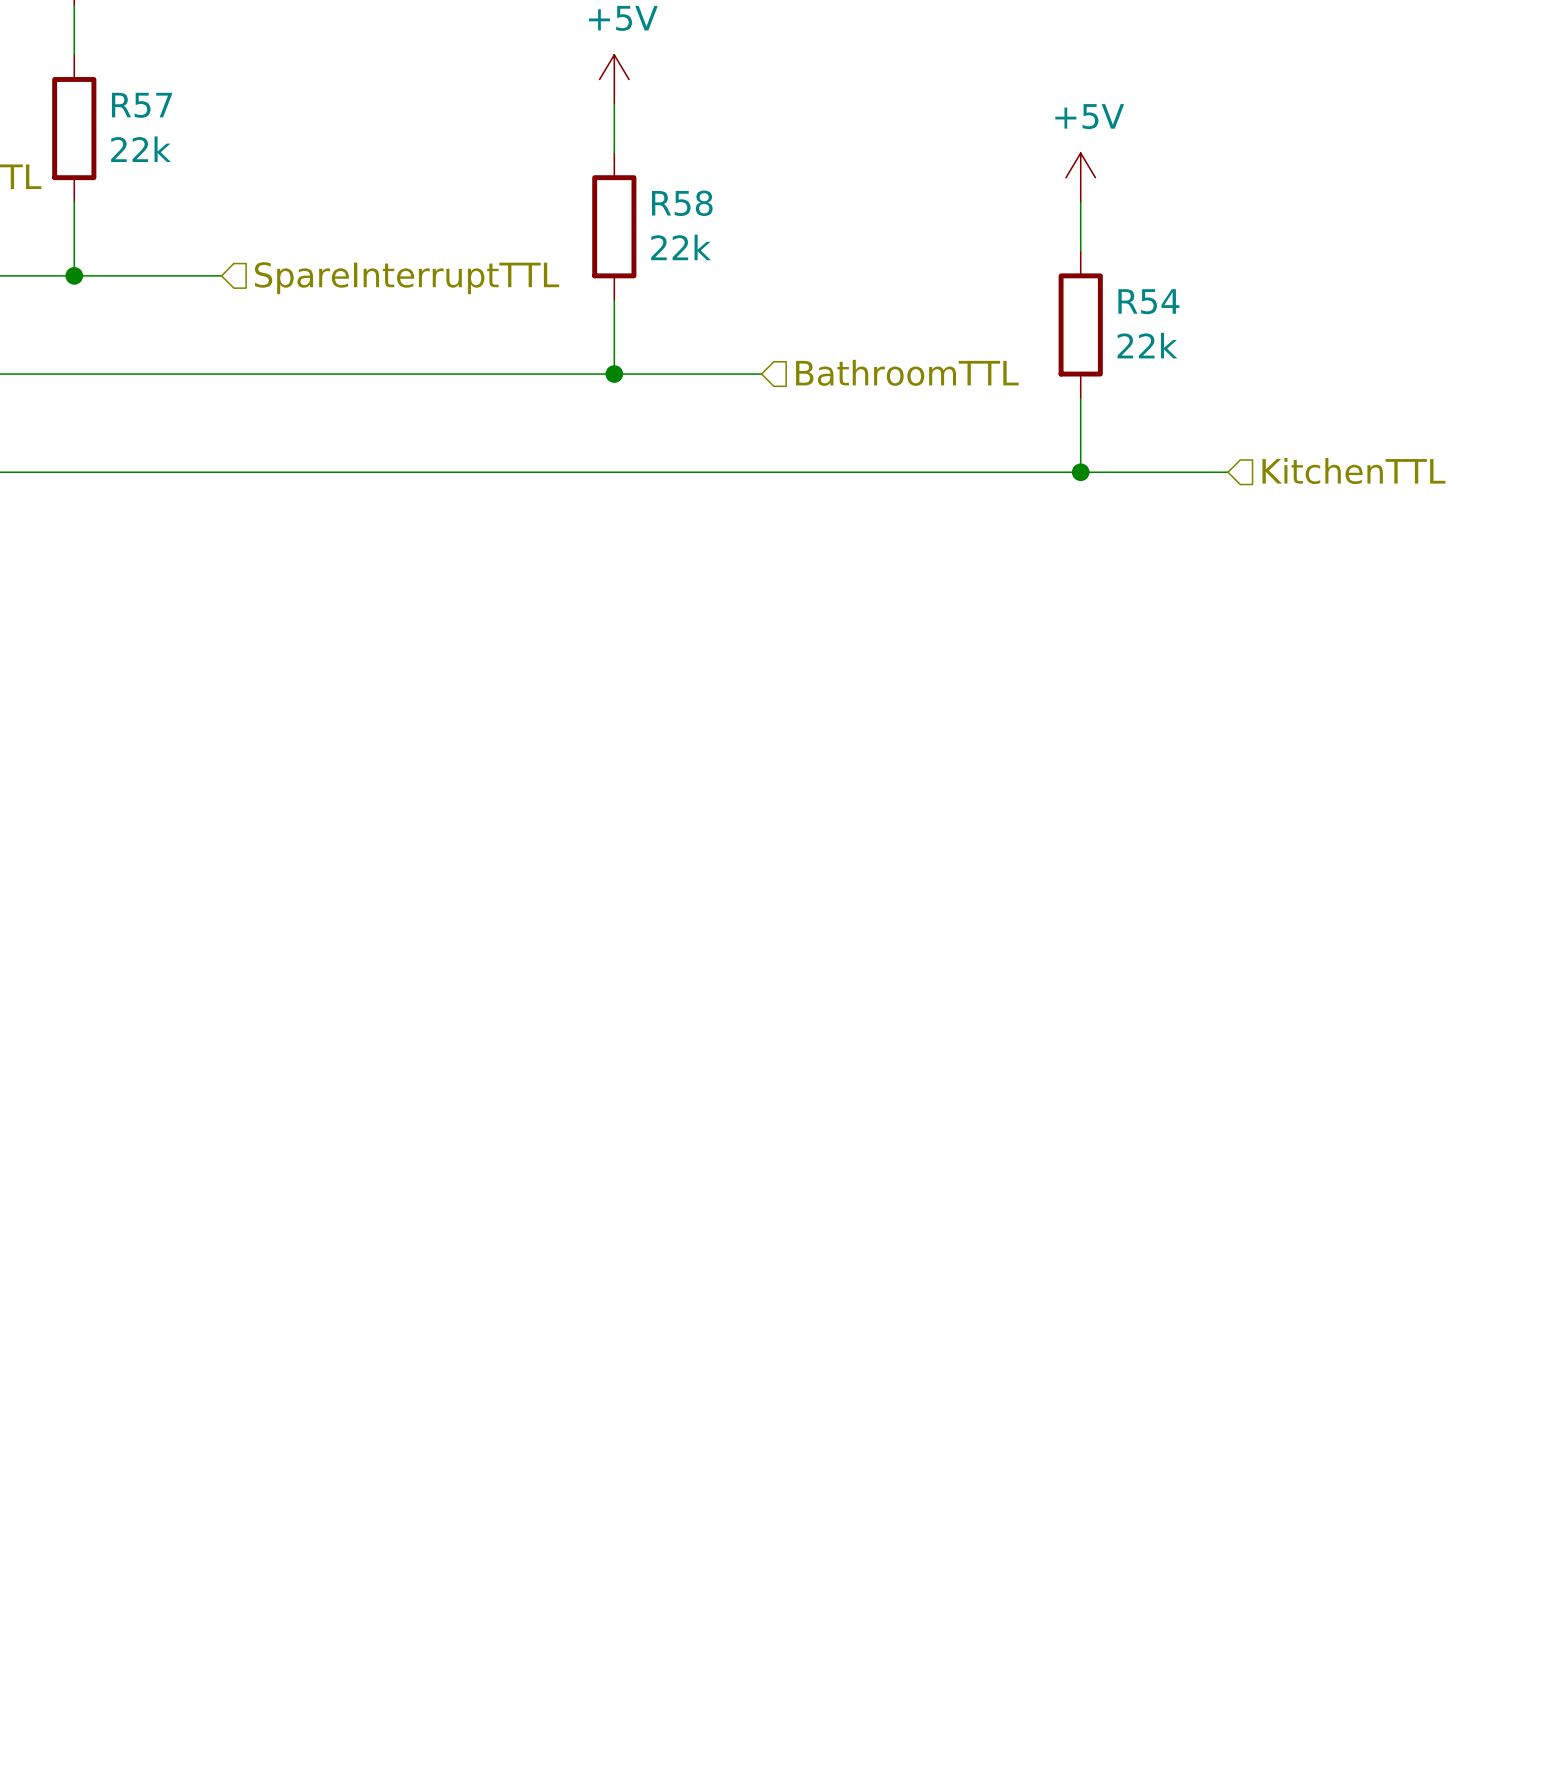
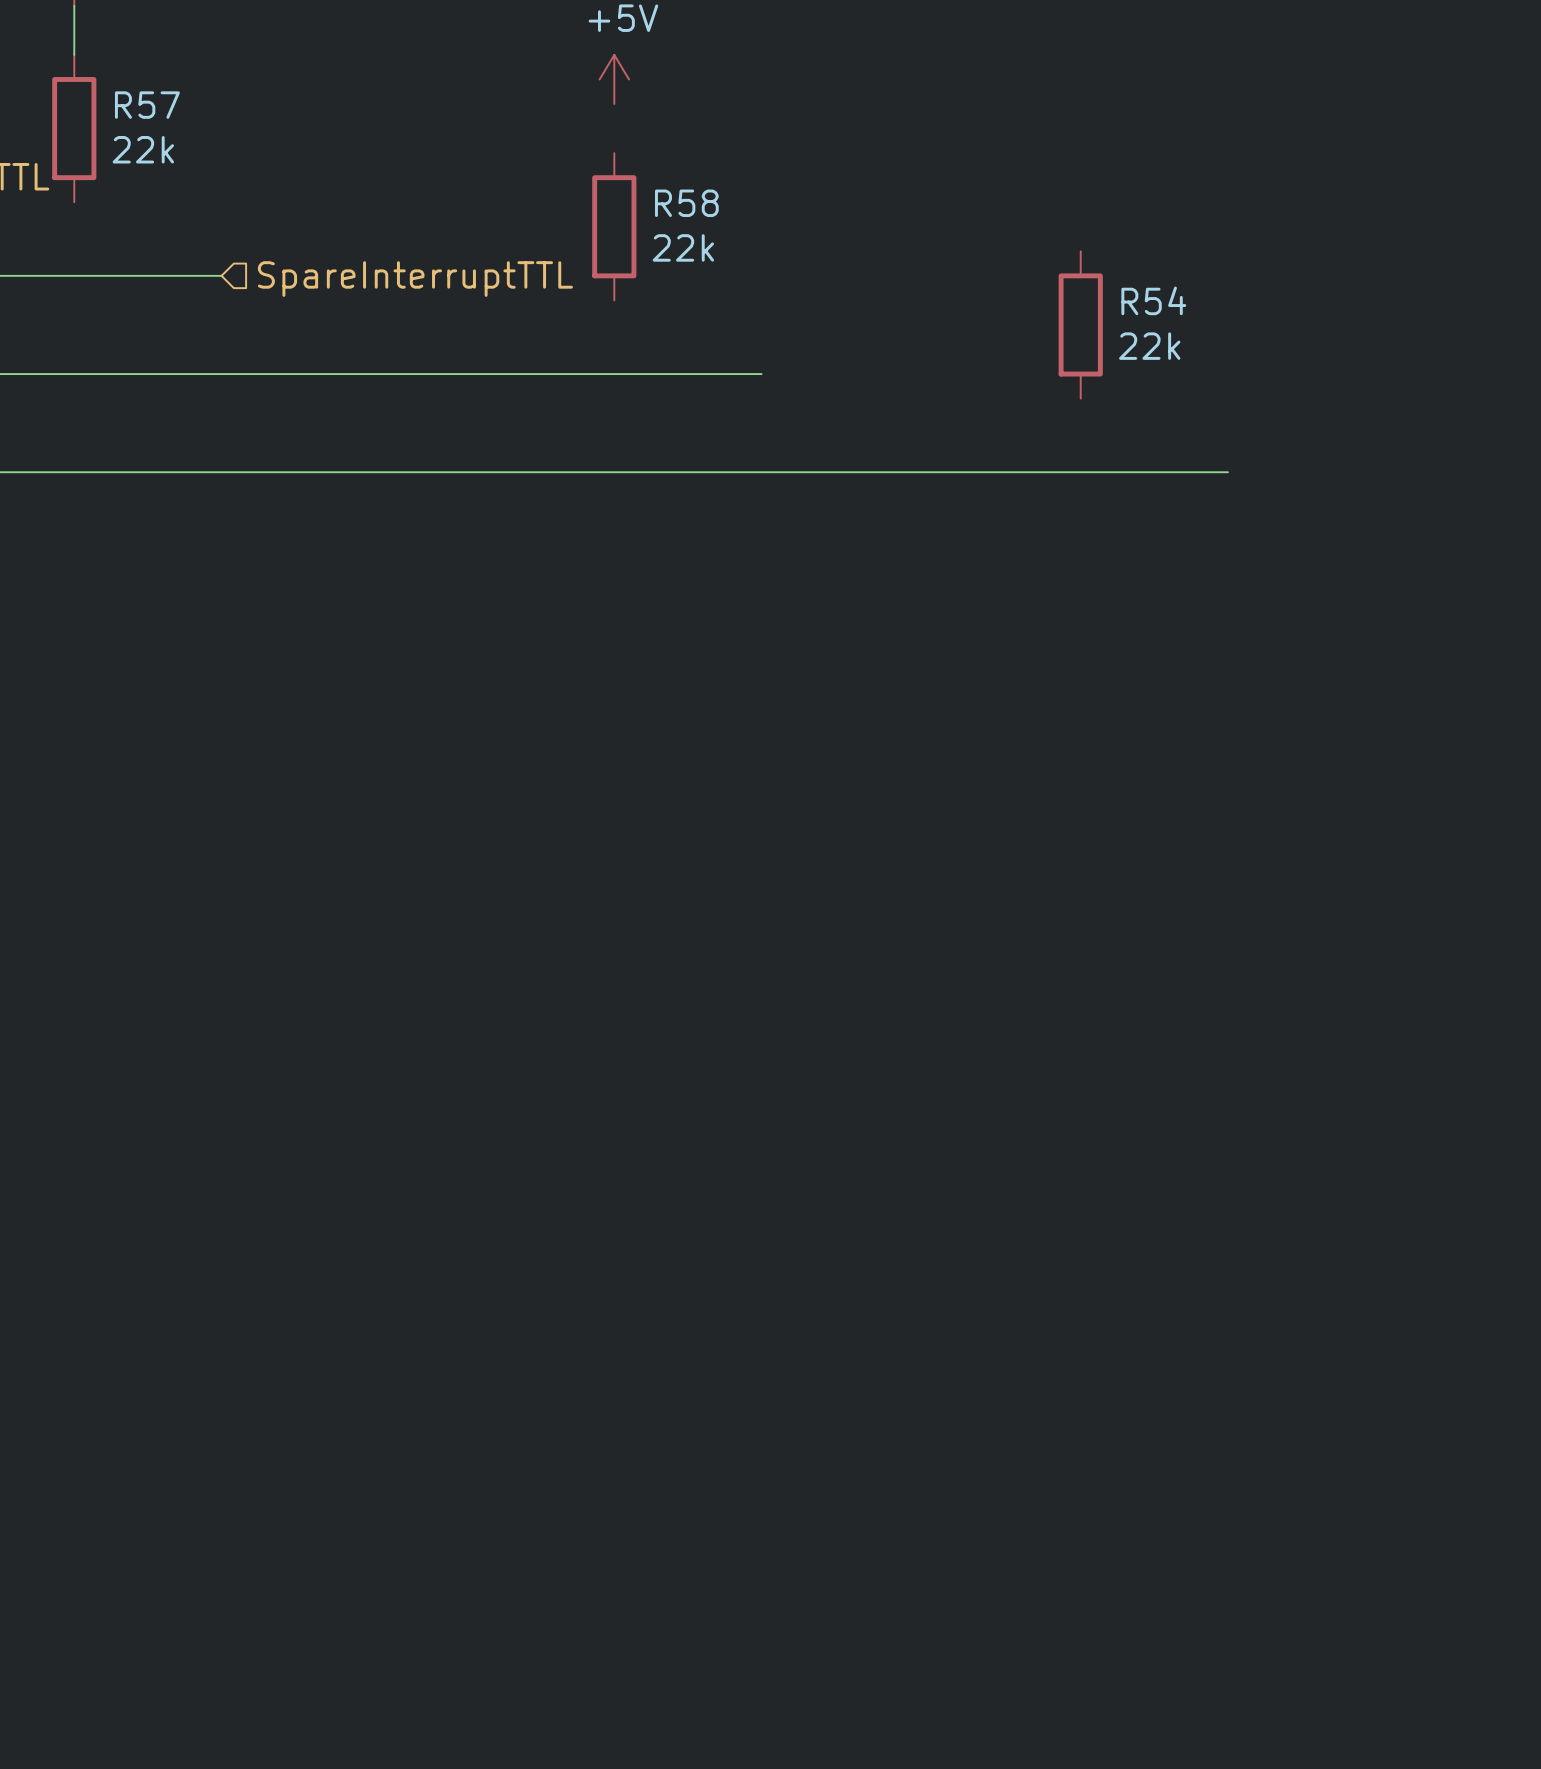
wire: (614, 104) (614, 153) -> none
power symbol: +5V (1080, 177) -> none
wire: (74, 202) (74, 275) -> none
wire: (1080, 202) (1080, 251) -> none
junction: (74, 275) -> none
wire: (614, 300) (614, 374) -> none
hierarchical label: BathroomTTL (907, 372) -> none
junction: (614, 374) -> none
wire: (1080, 398) (1080, 472) -> none
hierarchical label: KitchenTTL (1353, 471) -> none
junction: (1080, 472) -> none

